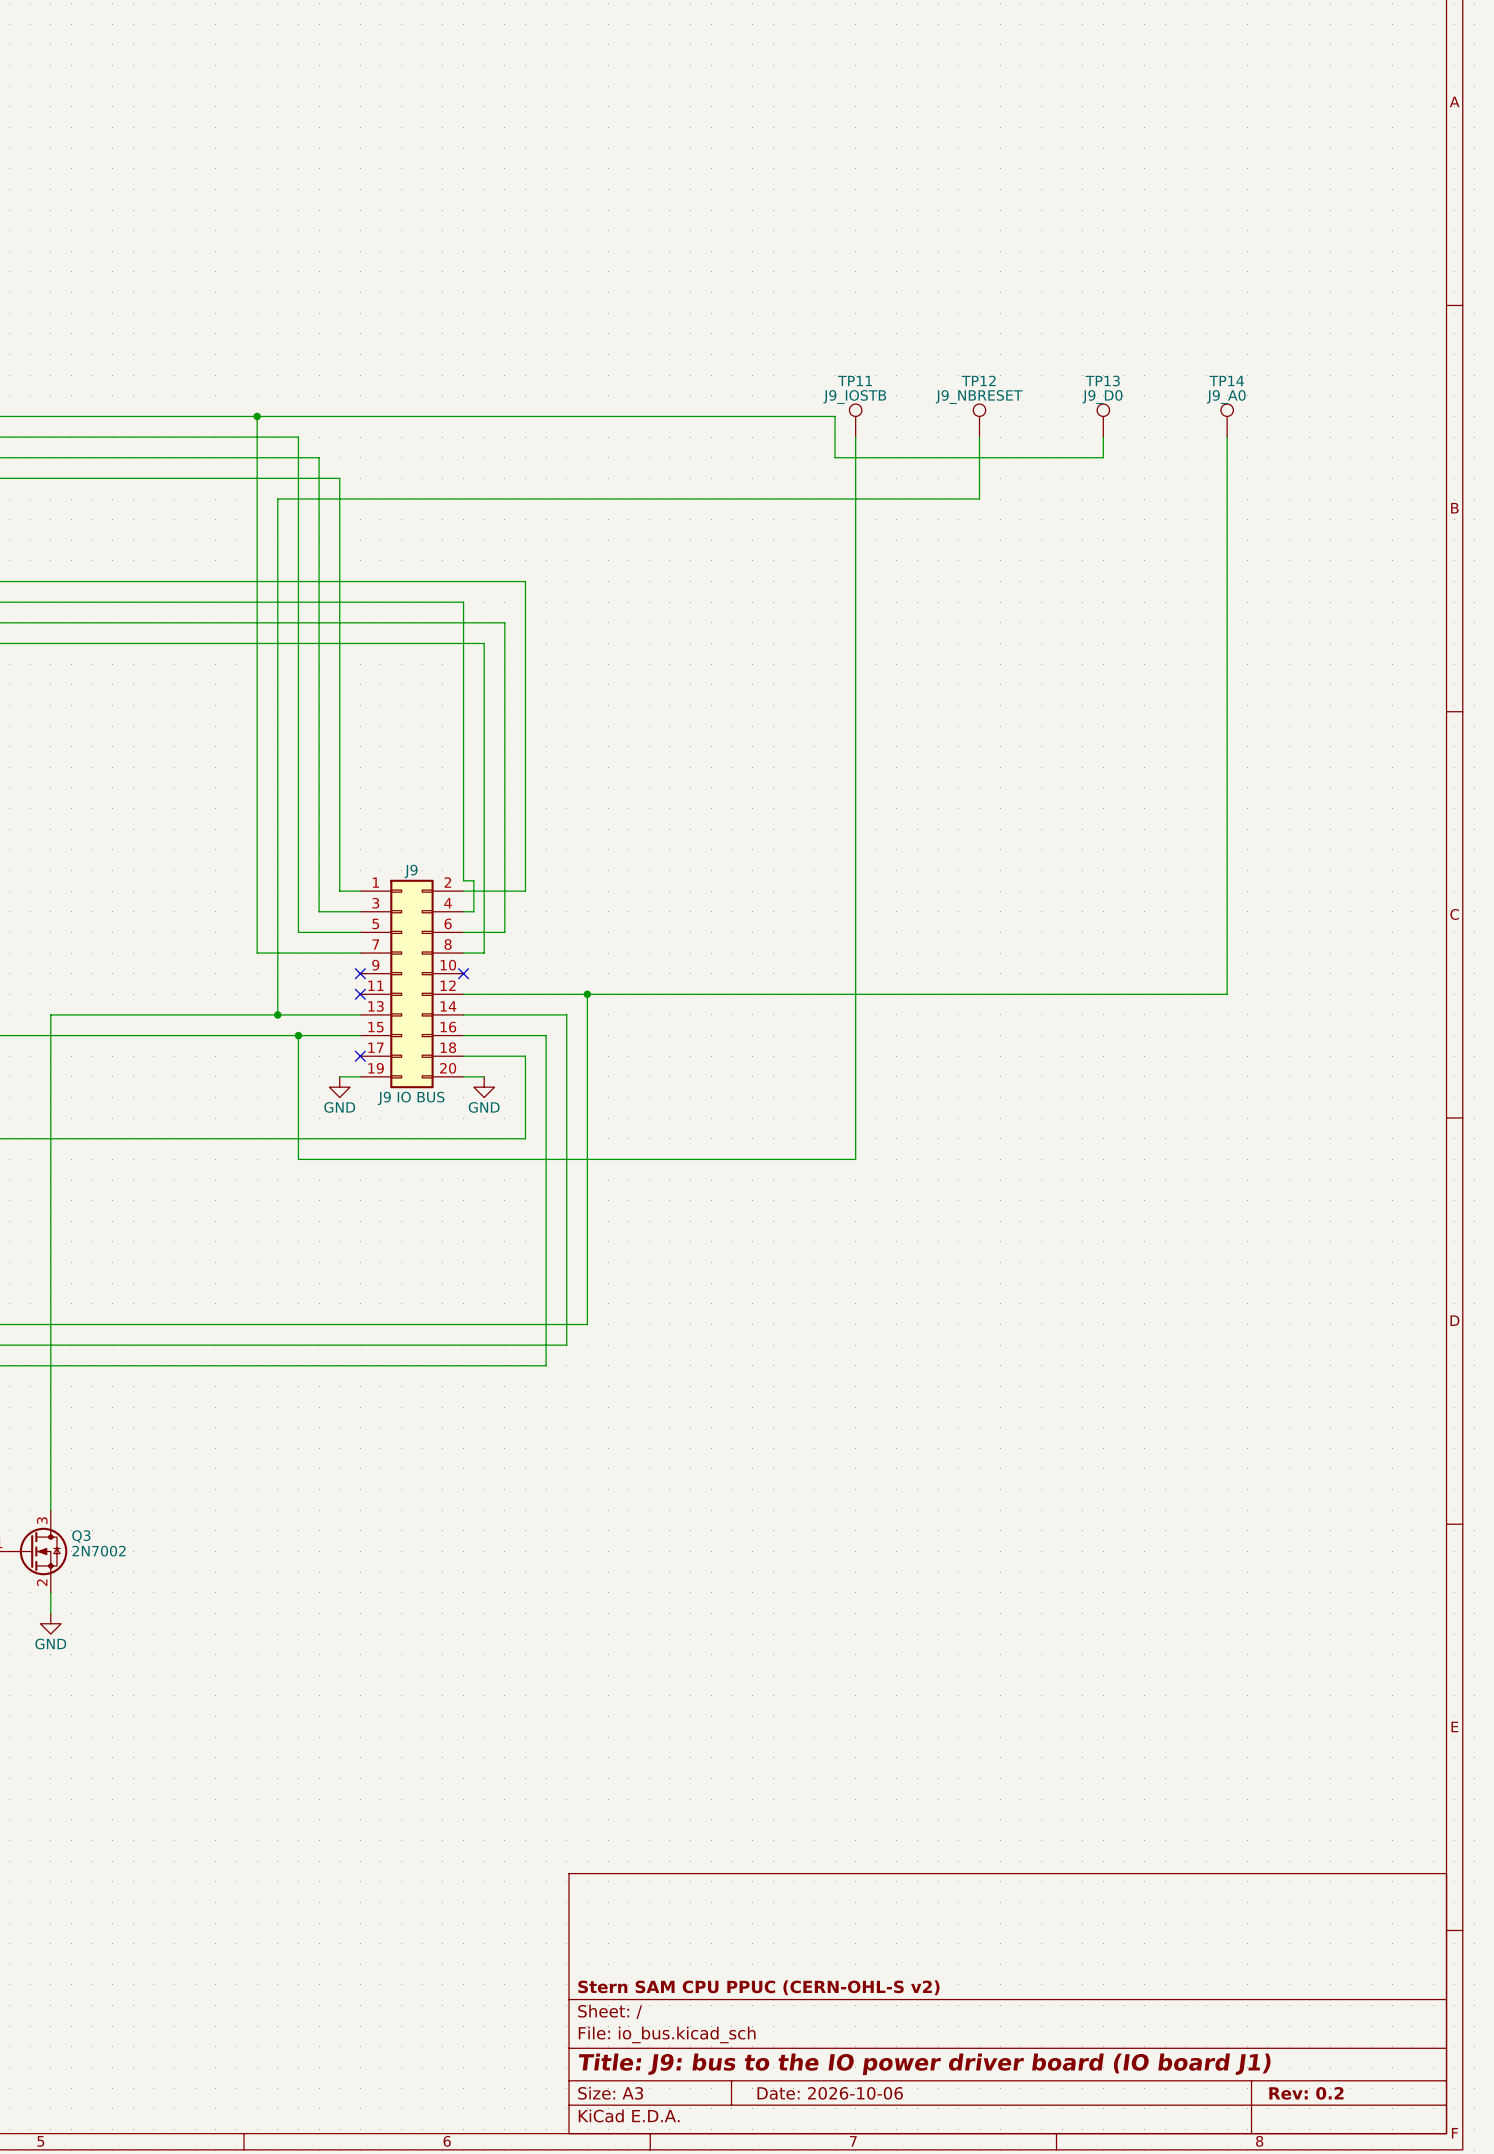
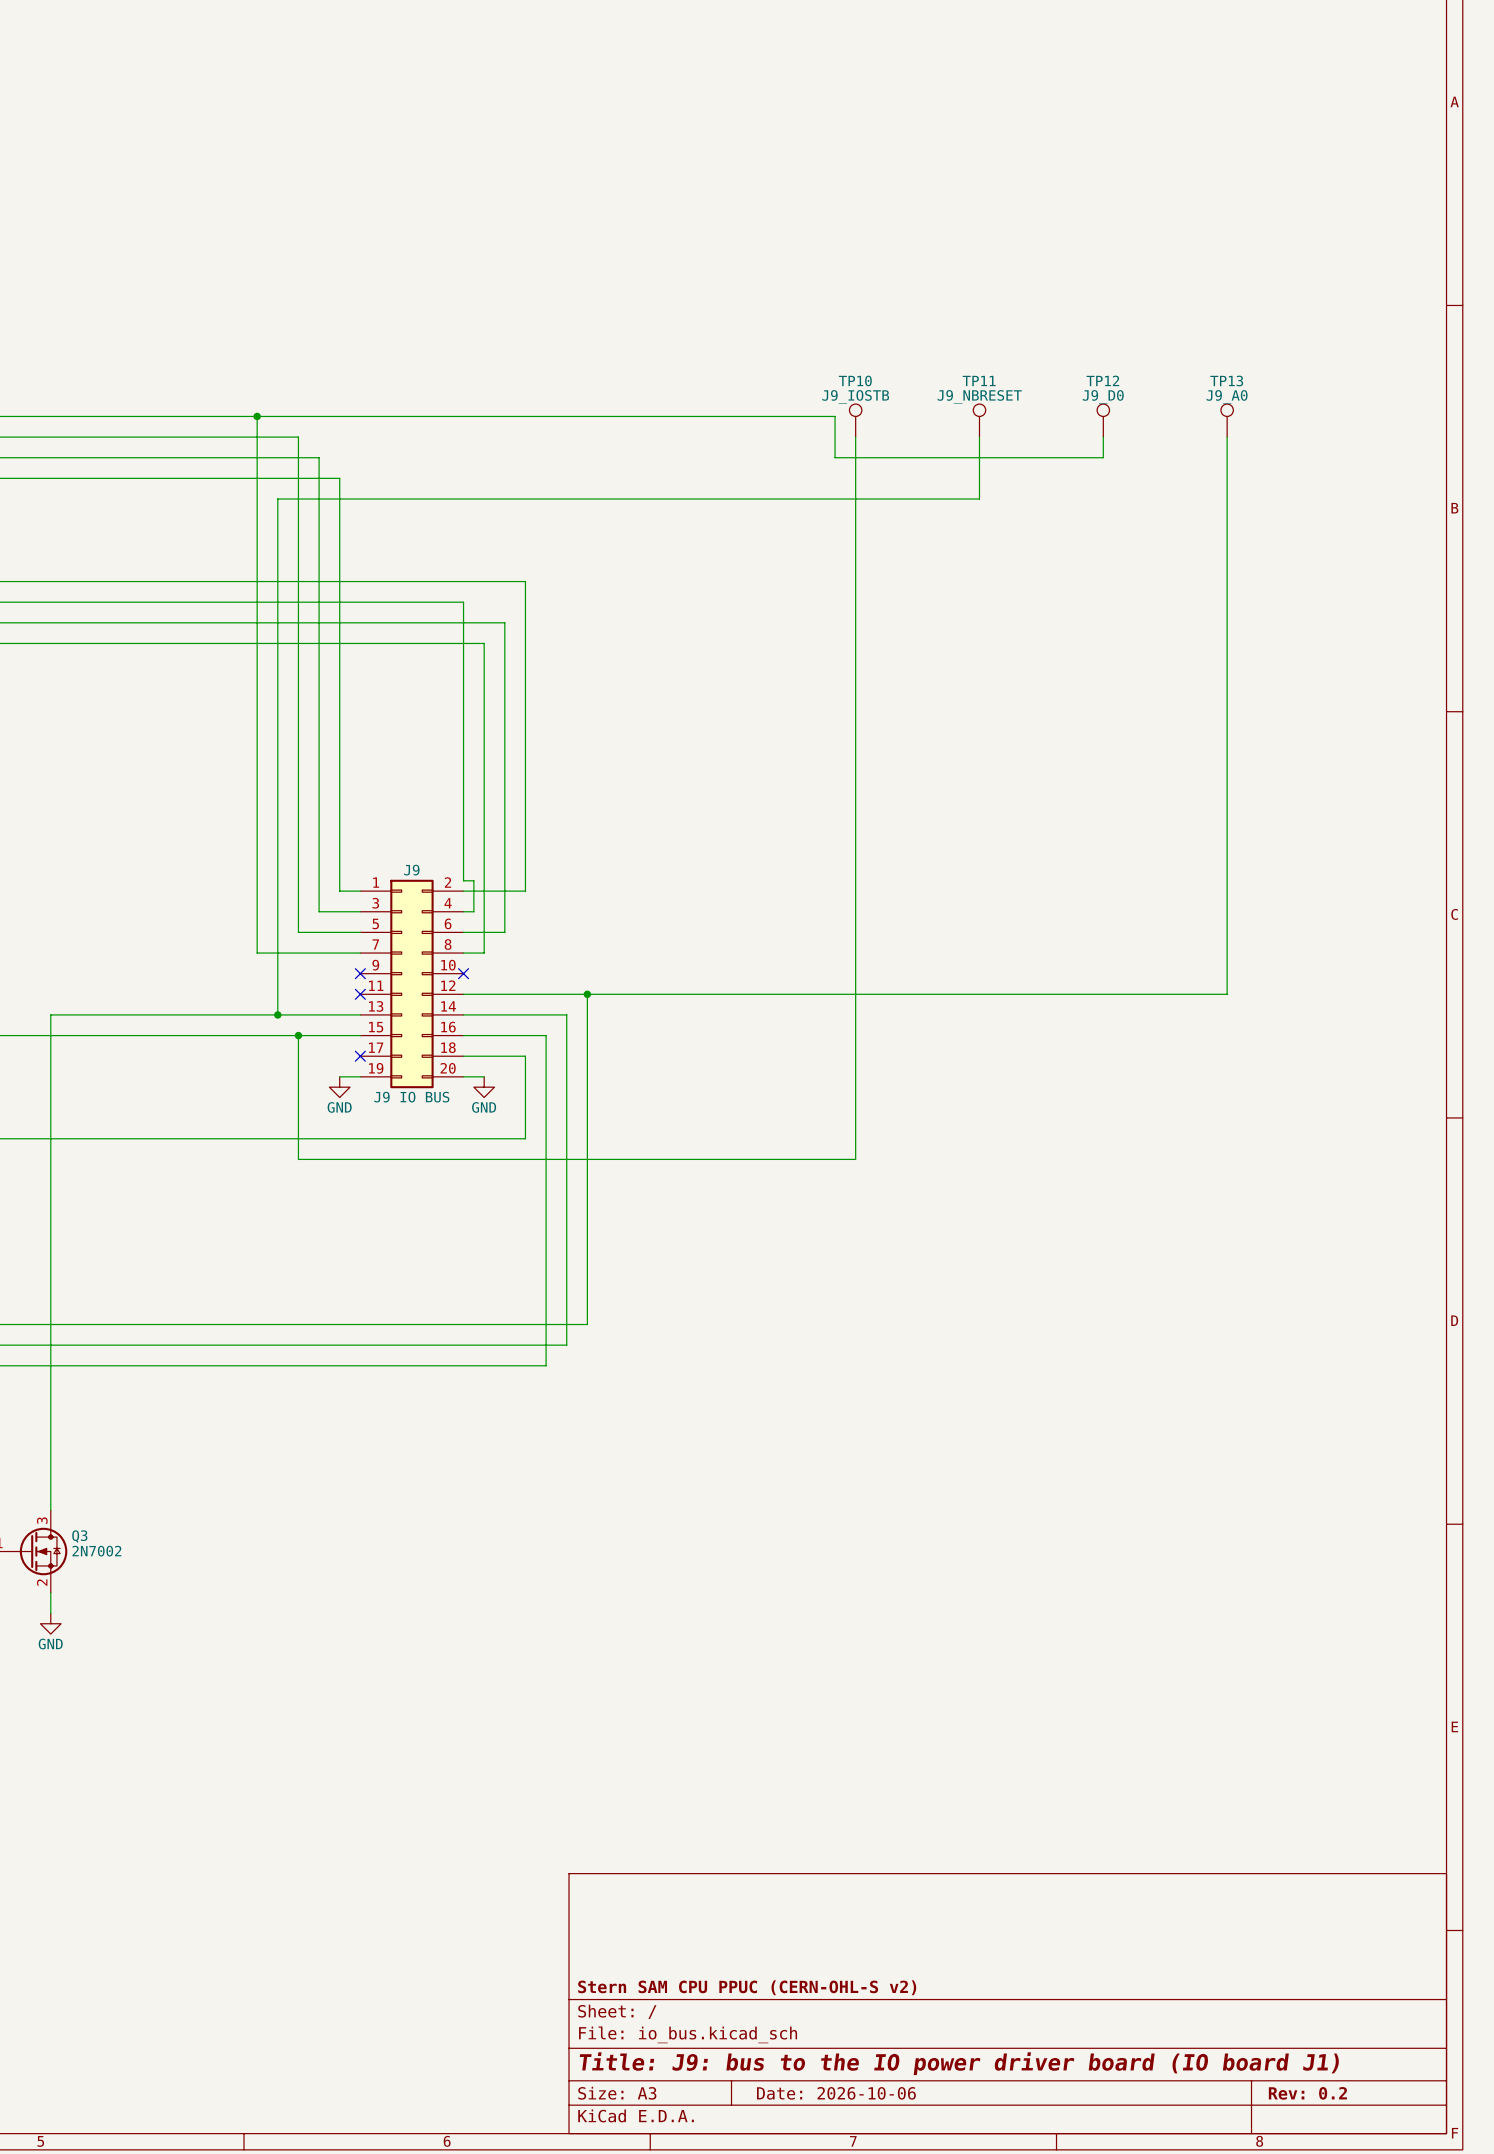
TP11 name: TP11 (854, 380) -> TP10 (855, 380)
TP12 name: TP12 (978, 380) -> TP11 (979, 380)
TP13 name: TP13 (1102, 380) -> TP12 (1102, 380)
TP14 name: TP14 (1226, 380) -> TP13 (1226, 380)

